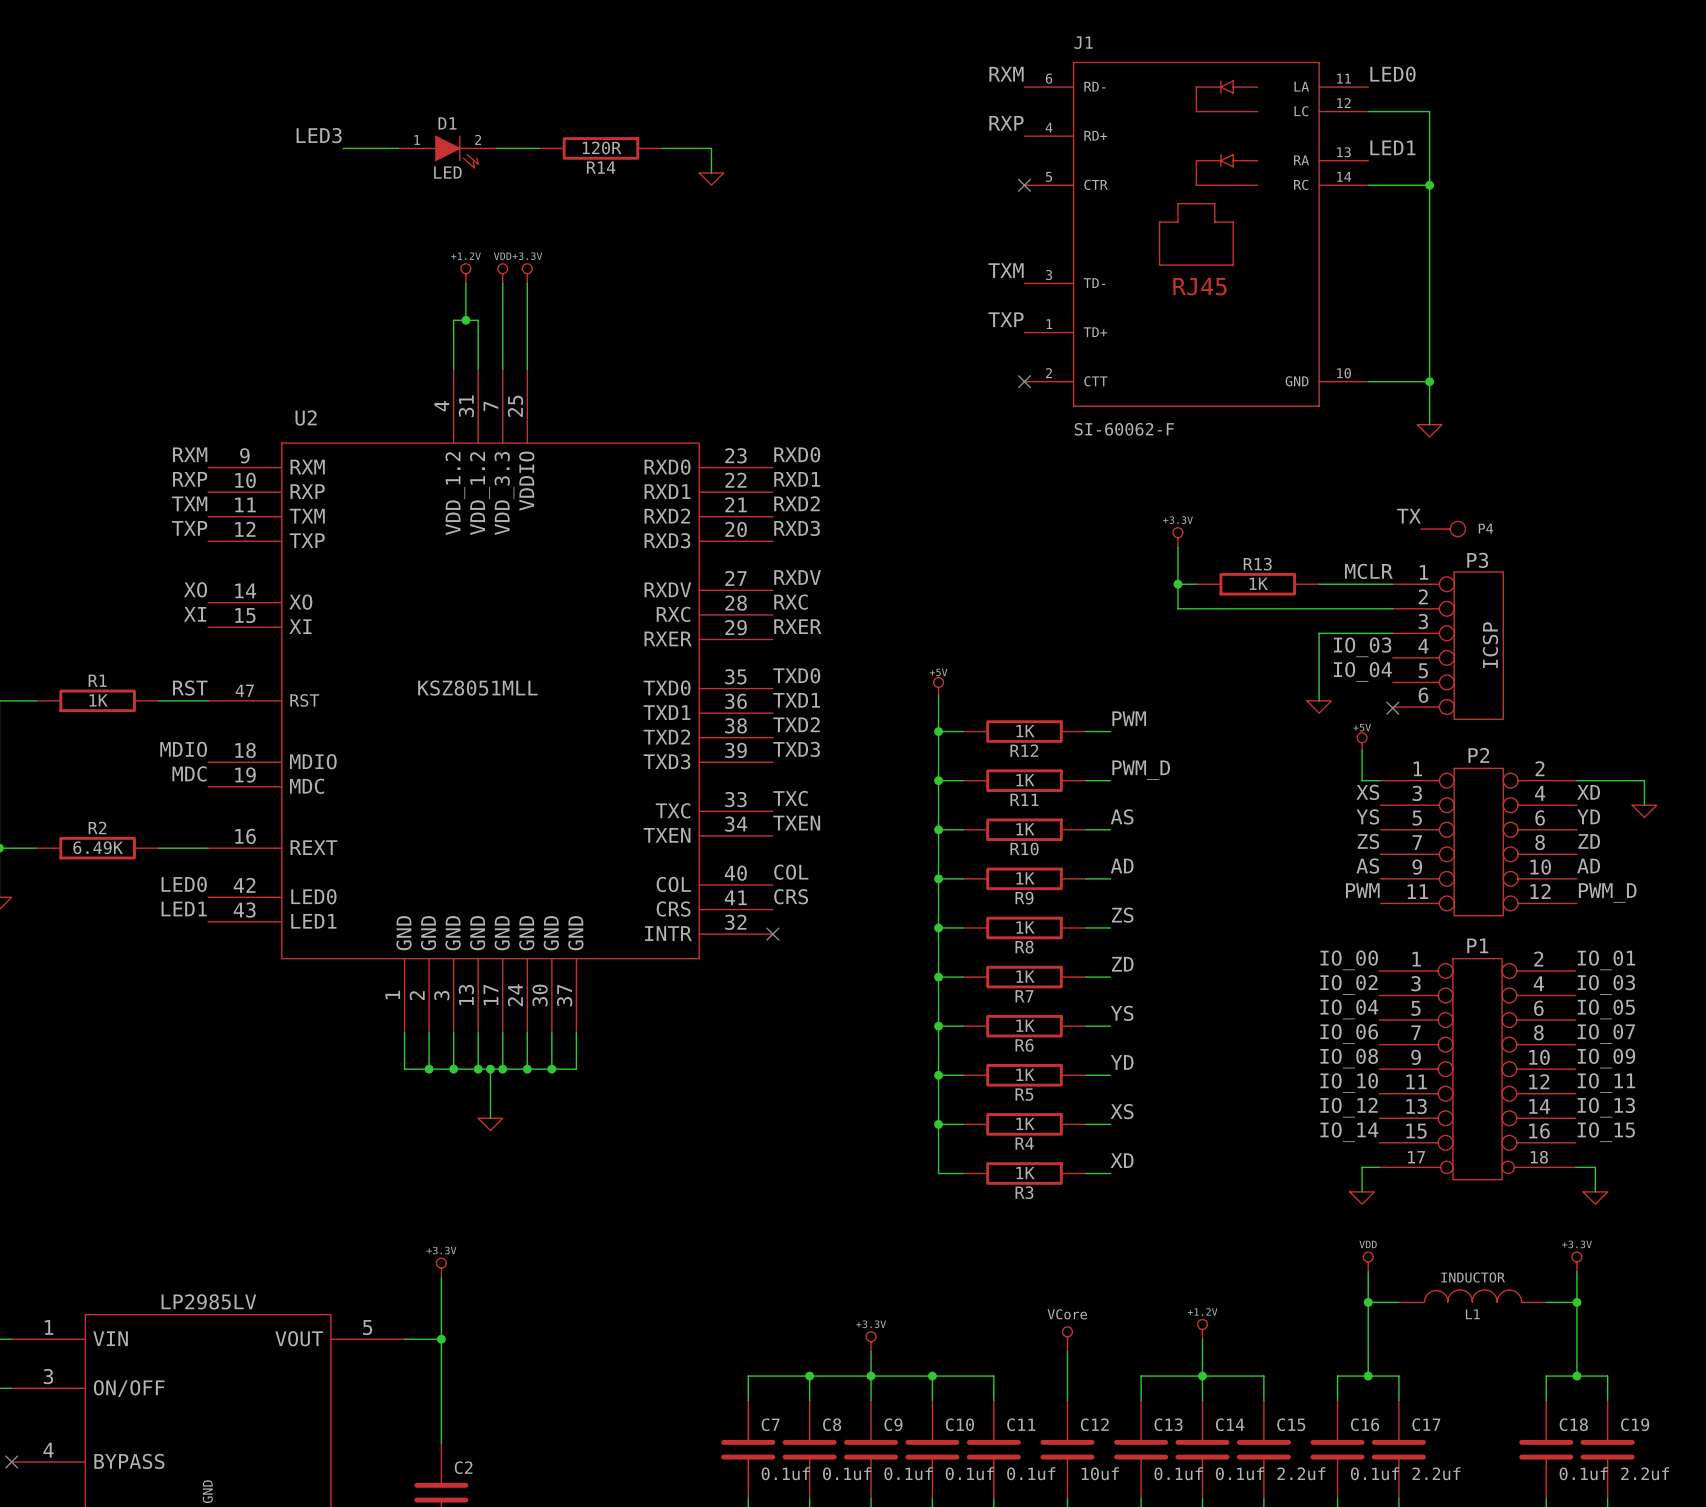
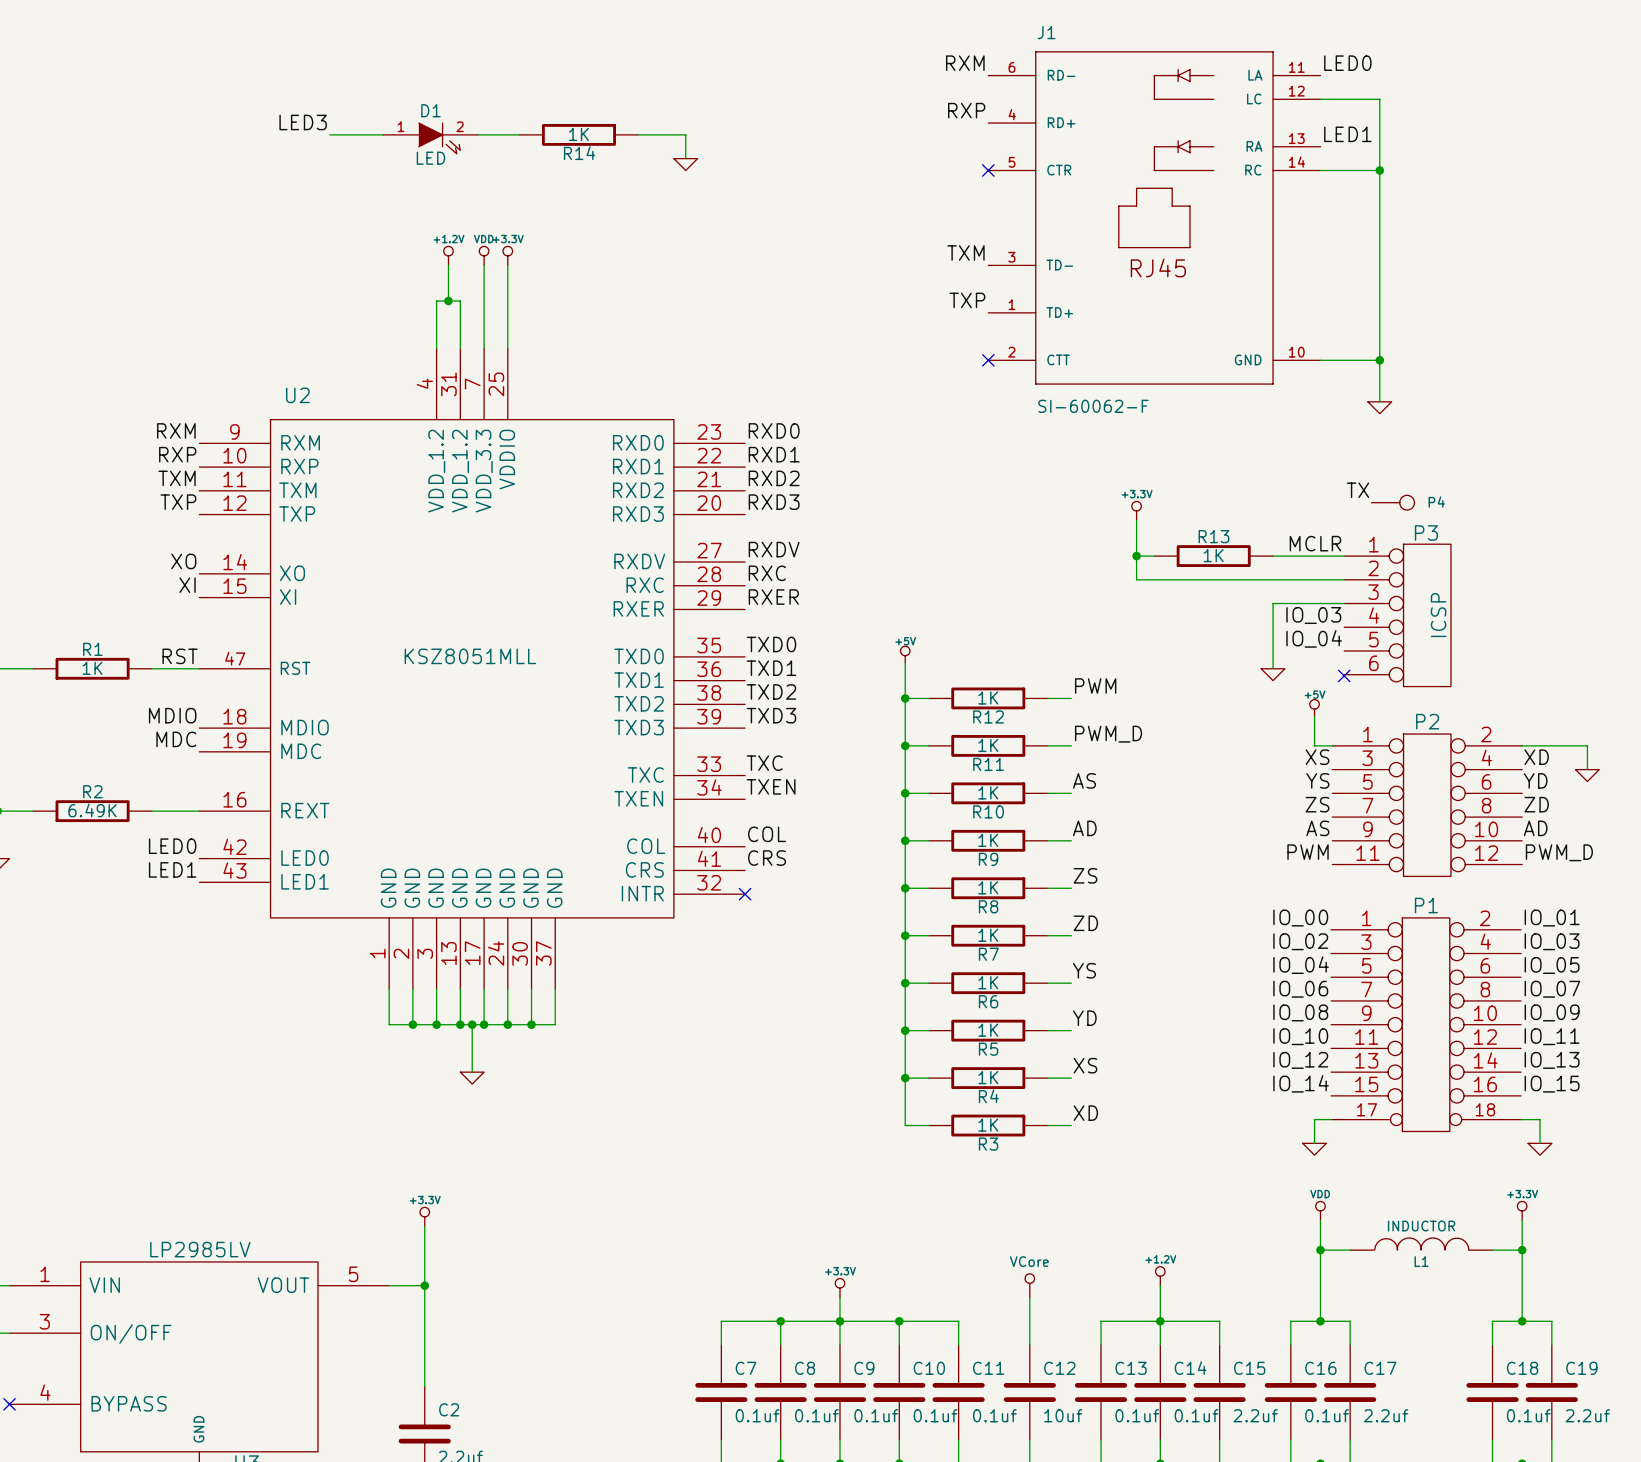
R14 value: 120R (601, 147) -> 1K (578, 134)

